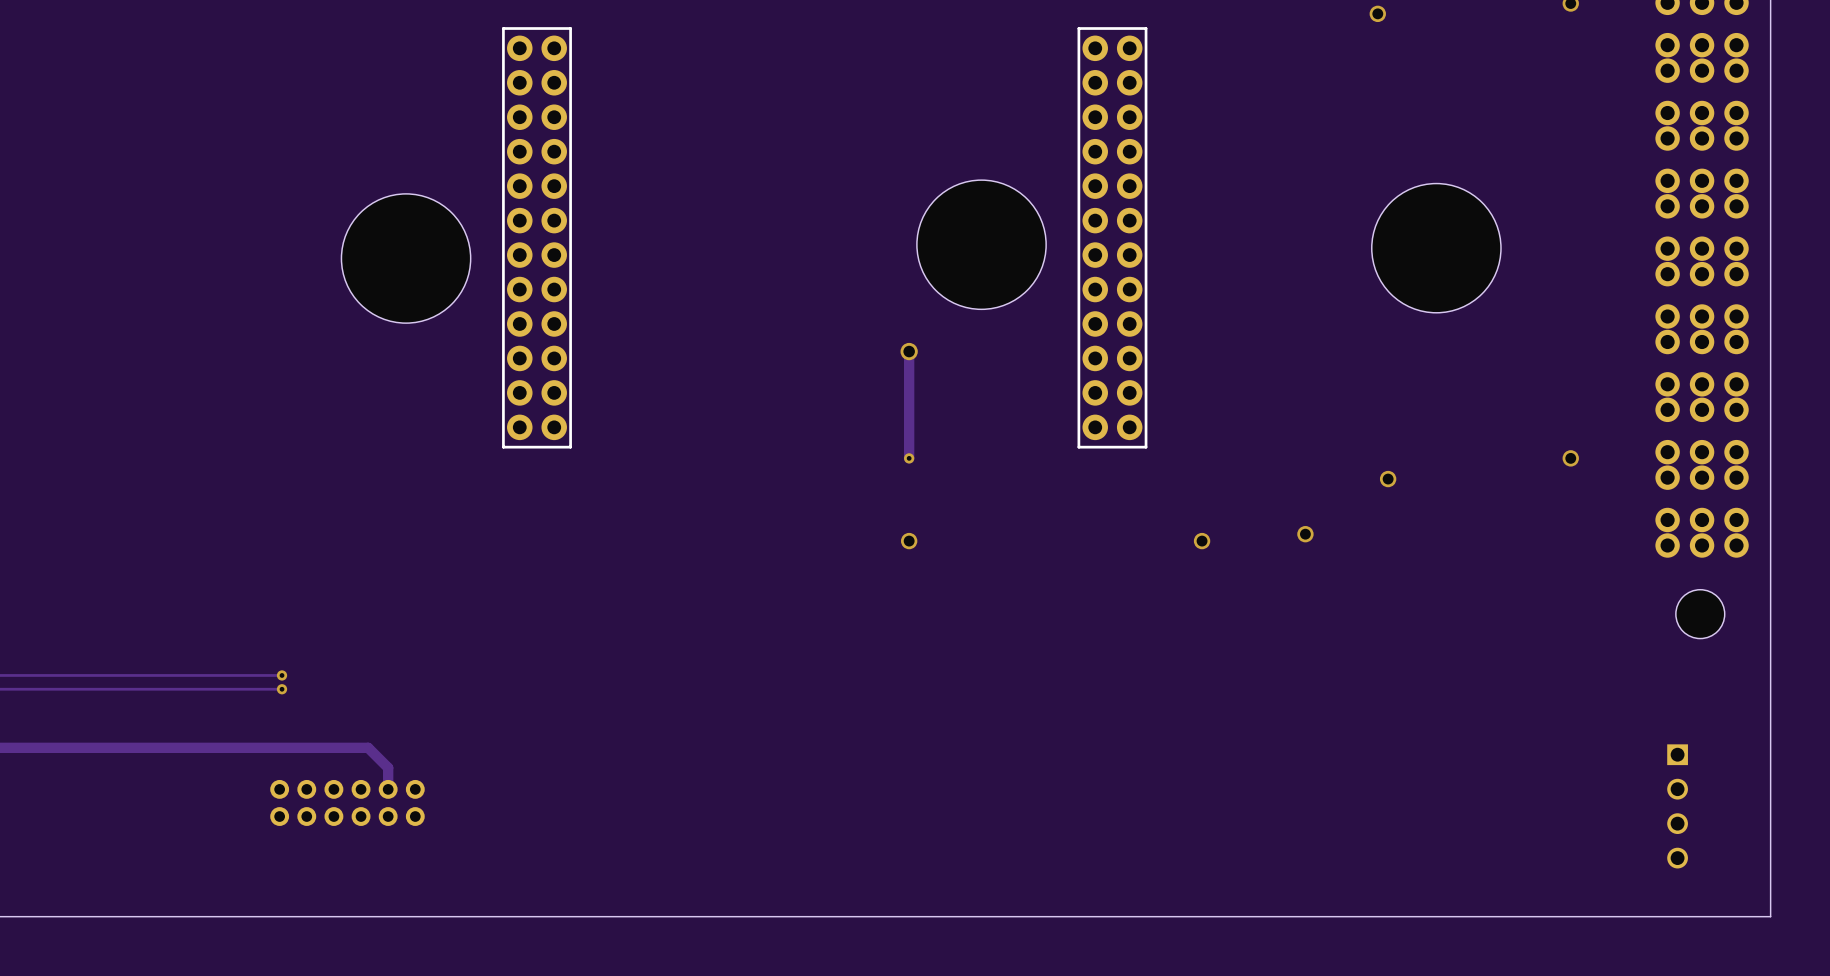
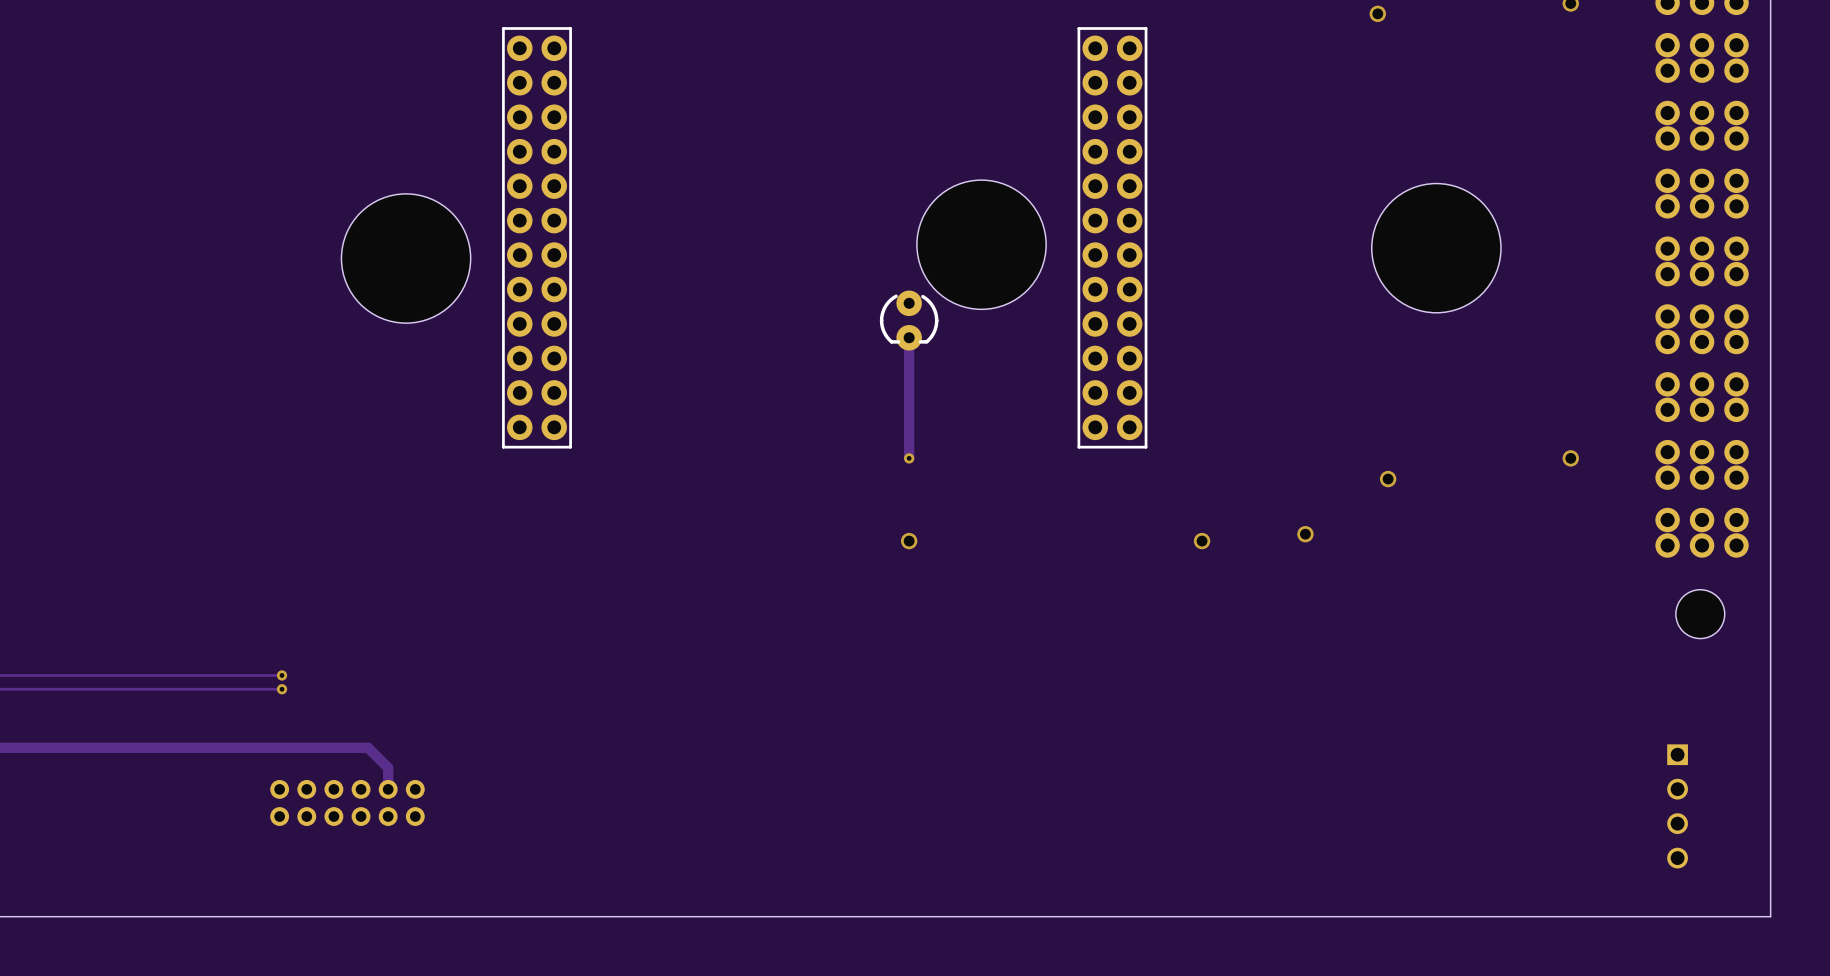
part: none -> (909, 320)
via: (909, 351) -> none

